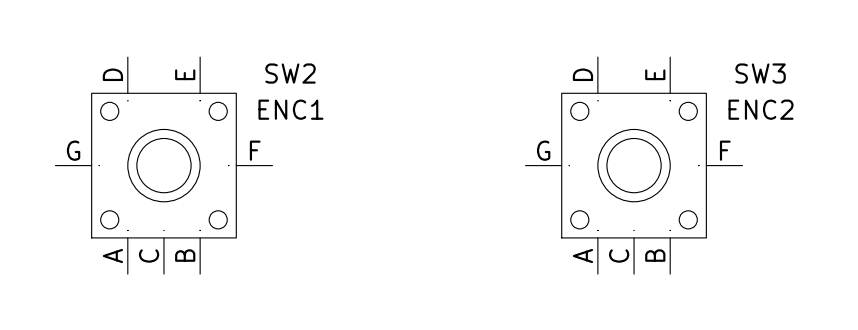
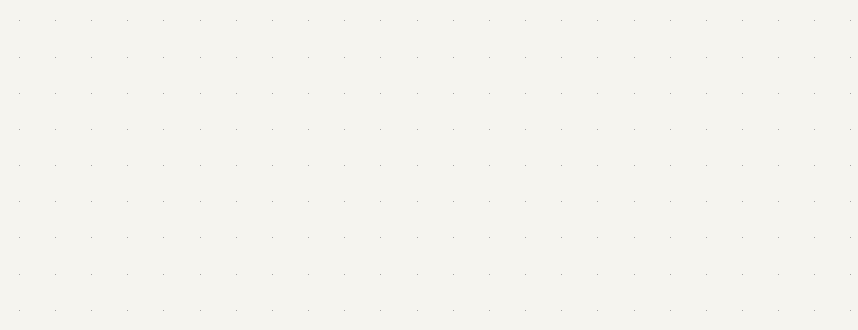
SW2: ENC1 (163, 165) -> none
SW3: ENC2 (634, 165) -> none

